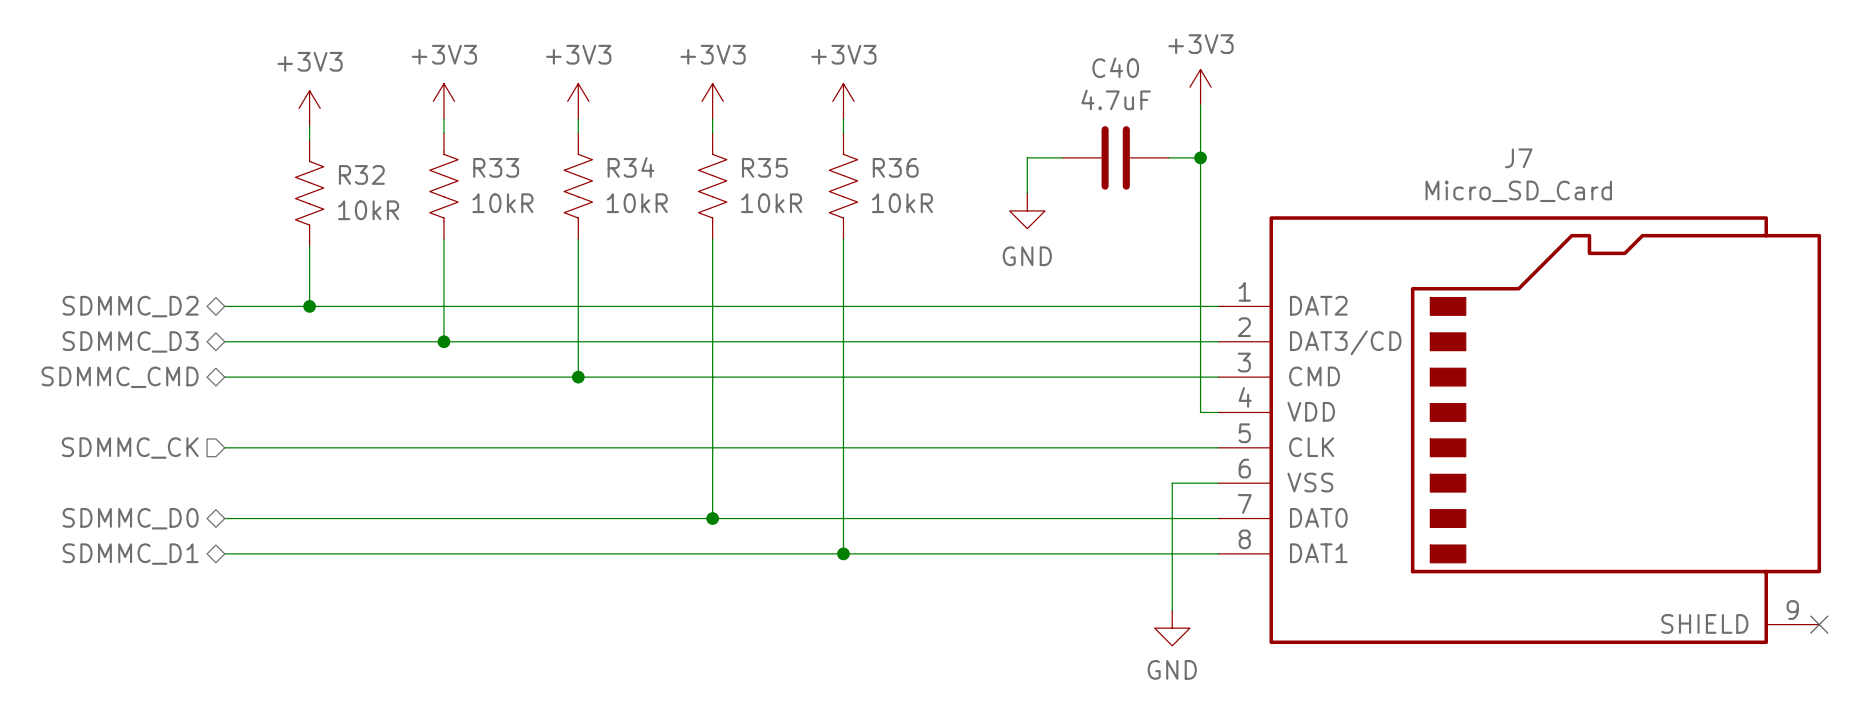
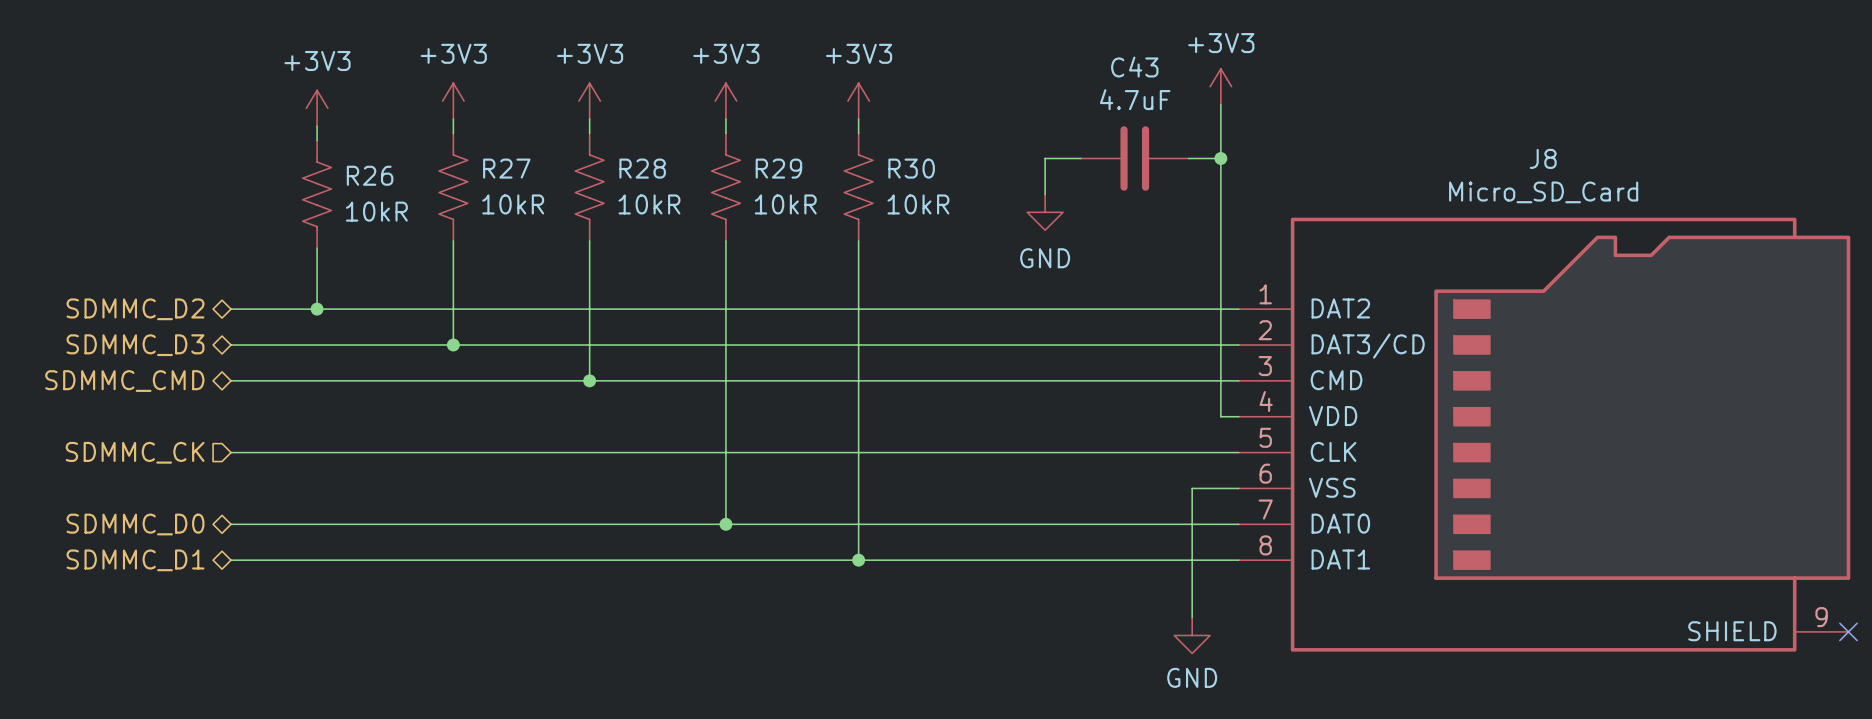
C40 name: C40 (1115, 67) -> C43 (1134, 67)
J7 name: J7 (1518, 158) -> J8 (1543, 158)
R33 name: R33 (496, 167) -> R27 (506, 168)
R34 name: R34 (630, 167) -> R28 (642, 168)
R35 name: R35 (764, 167) -> R29 (778, 168)
R36 name: R36 (895, 167) -> R30 (911, 168)
R32 name: R32 (361, 174) -> R26 (370, 175)

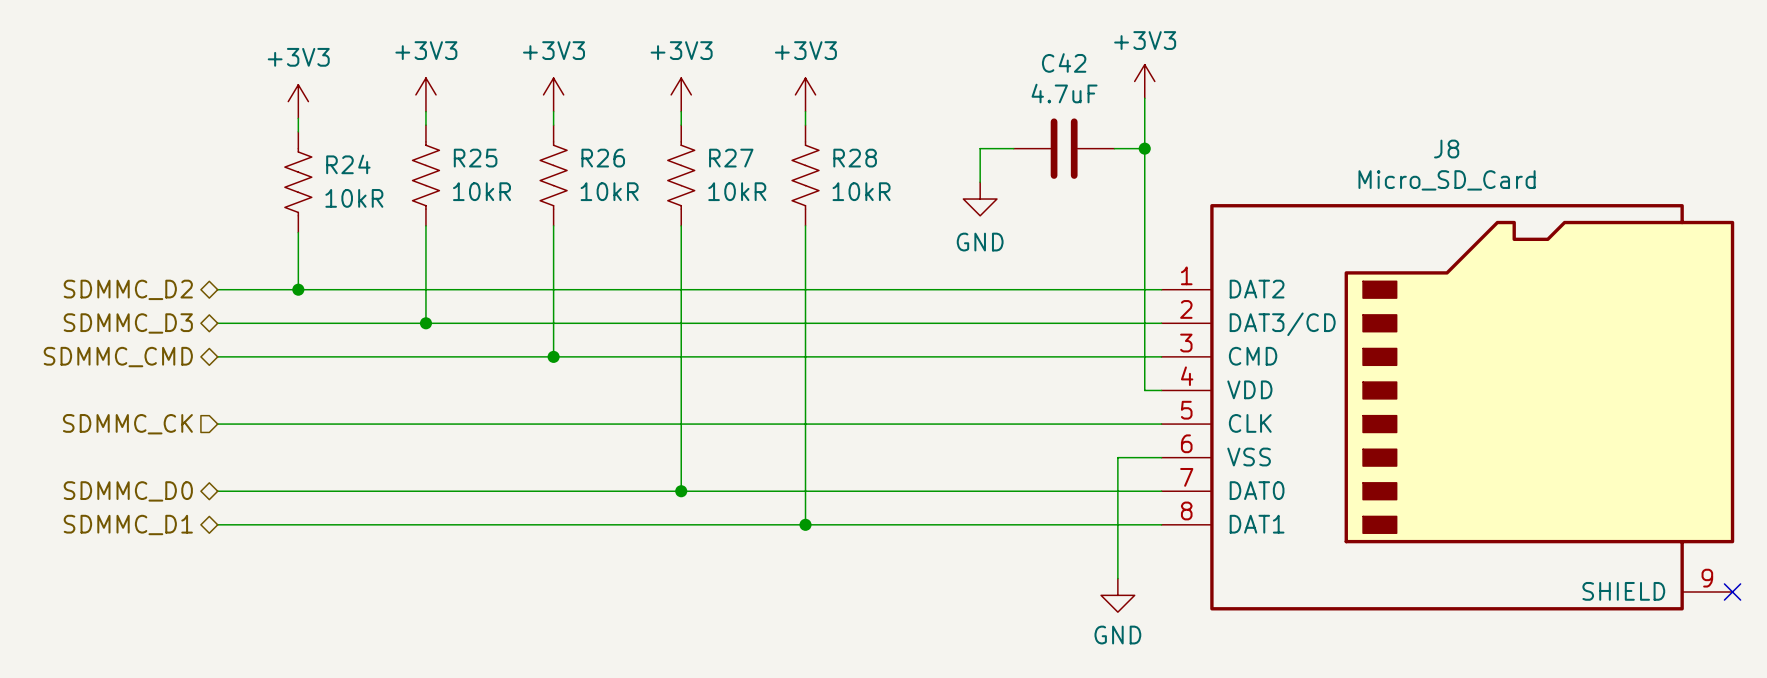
C43 name: C43 (1134, 67) -> C42 (1064, 62)
R27 name: R27 (506, 168) -> R25 (475, 158)
R28 name: R28 (642, 168) -> R26 (603, 158)
R29 name: R29 (778, 168) -> R27 (731, 158)
R30 name: R30 (911, 168) -> R28 (855, 158)
R26 name: R26 (370, 175) -> R24 (348, 164)

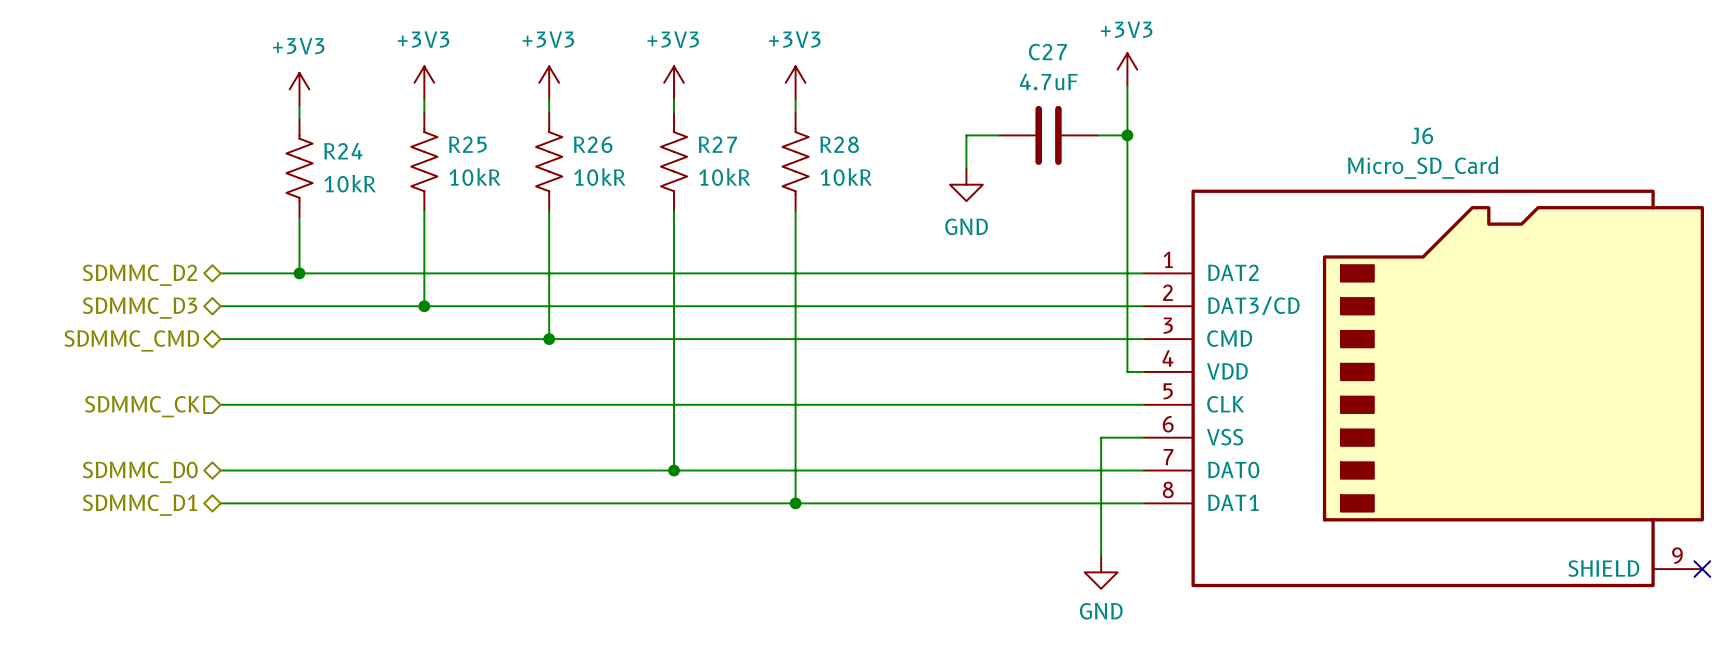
C42 name: C42 (1064, 62) -> C27 (1047, 52)
J8 name: J8 (1446, 149) -> J6 (1422, 135)

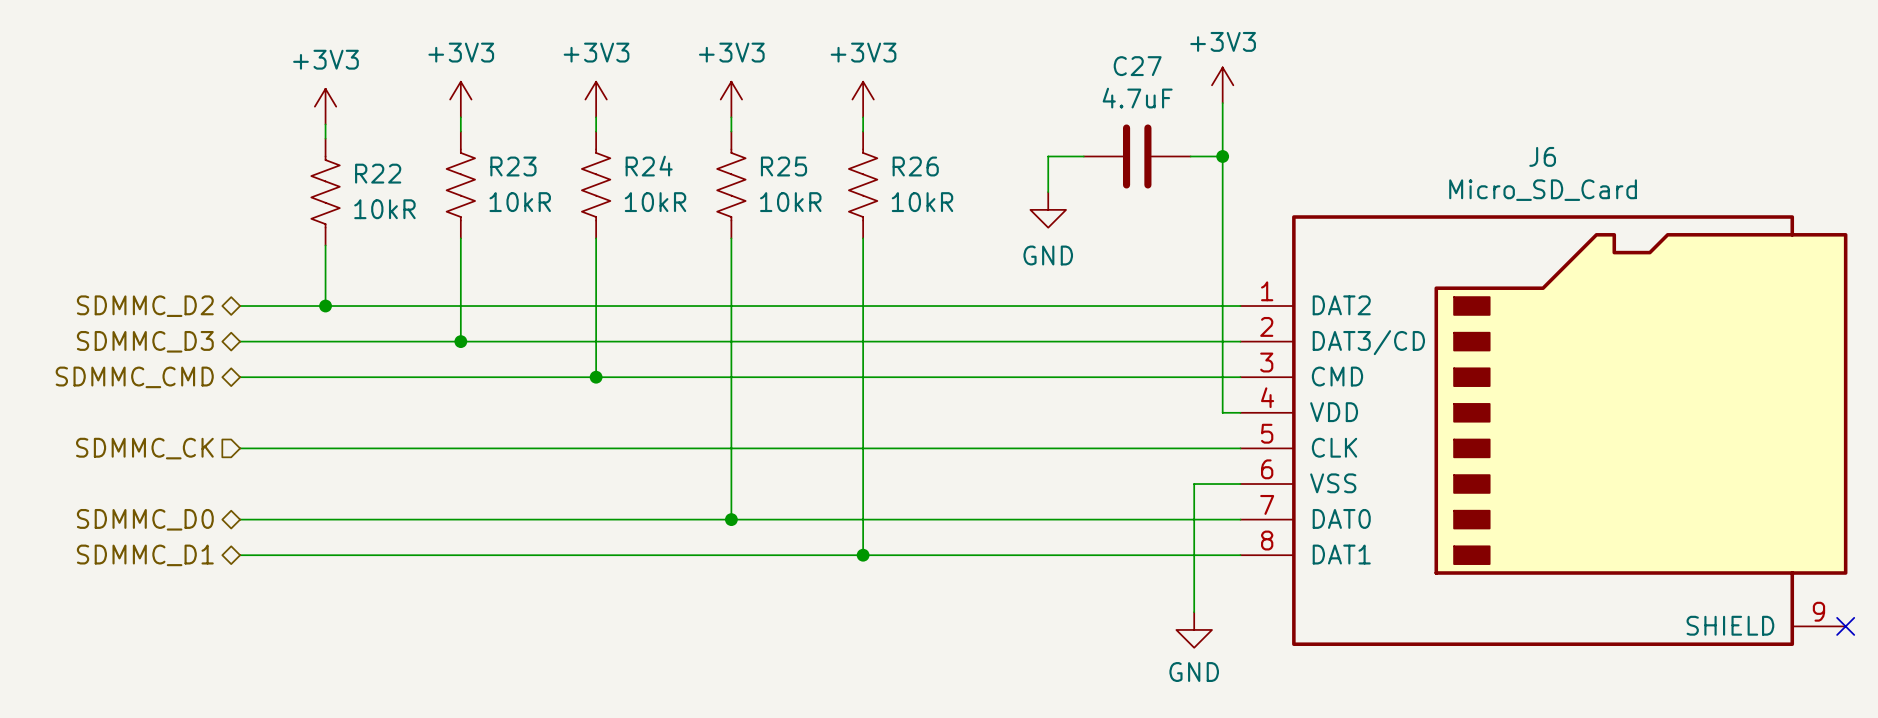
R25 name: R25 (467, 144) -> R23 (513, 166)
R26 name: R26 (593, 144) -> R24 (649, 166)
R27 name: R27 (717, 144) -> R25 (783, 166)
R28 name: R28 (839, 144) -> R26 (915, 166)
R24 name: R24 (343, 151) -> R22 (378, 173)

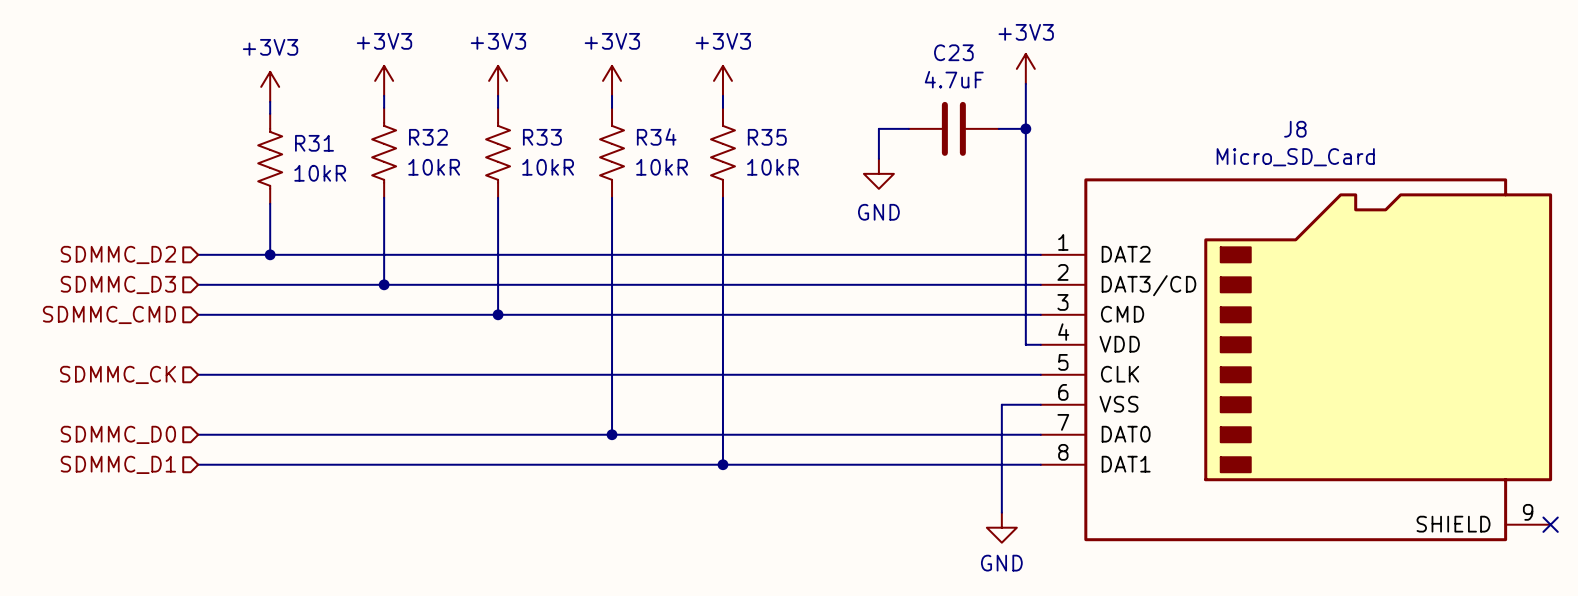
C27 name: C27 (1137, 66) -> C23 (953, 52)
J6 name: J6 (1542, 156) -> J8 (1295, 129)
R23 name: R23 (513, 166) -> R32 (428, 137)
R24 name: R24 (649, 166) -> R33 (542, 137)
R25 name: R25 (783, 166) -> R34 (656, 136)
R26 name: R26 (915, 166) -> R35 (767, 137)
R22 name: R22 (378, 173) -> R31 (314, 143)
hierarchical label shape: bidirectional (145, 306) -> input (118, 254)
hierarchical label shape: bidirectional (145, 341) -> input (118, 284)
hierarchical label shape: bidirectional (134, 377) -> input (109, 314)
hierarchical label shape: bidirectional (145, 519) -> input (118, 434)
hierarchical label shape: bidirectional (145, 555) -> input (118, 464)

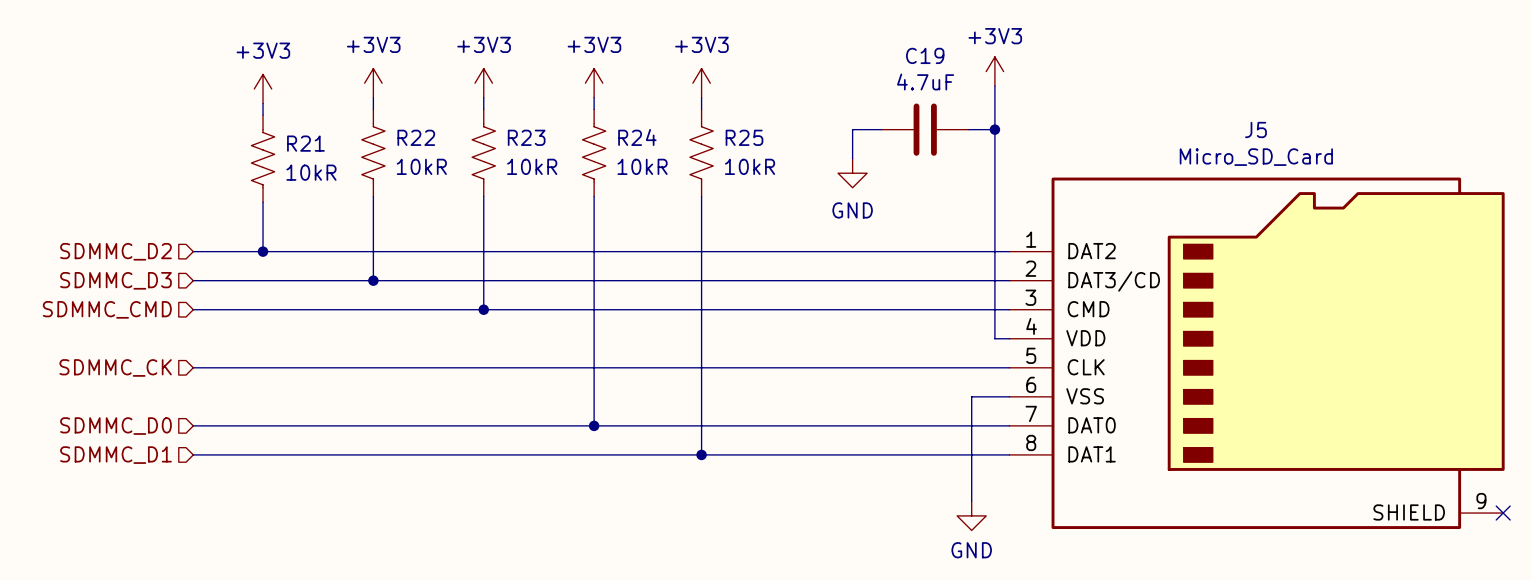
C23 name: C23 (953, 52) -> C19 (925, 55)
J8 name: J8 (1295, 129) -> J5 (1255, 129)
R34 name: R34 (656, 136) -> R24 (637, 137)
R32 name: R32 (428, 137) -> R22 (416, 137)
R33 name: R33 (542, 137) -> R23 (526, 137)
R35 name: R35 (767, 137) -> R25 (744, 137)
R31 name: R31 (314, 143) -> R21 (305, 143)

